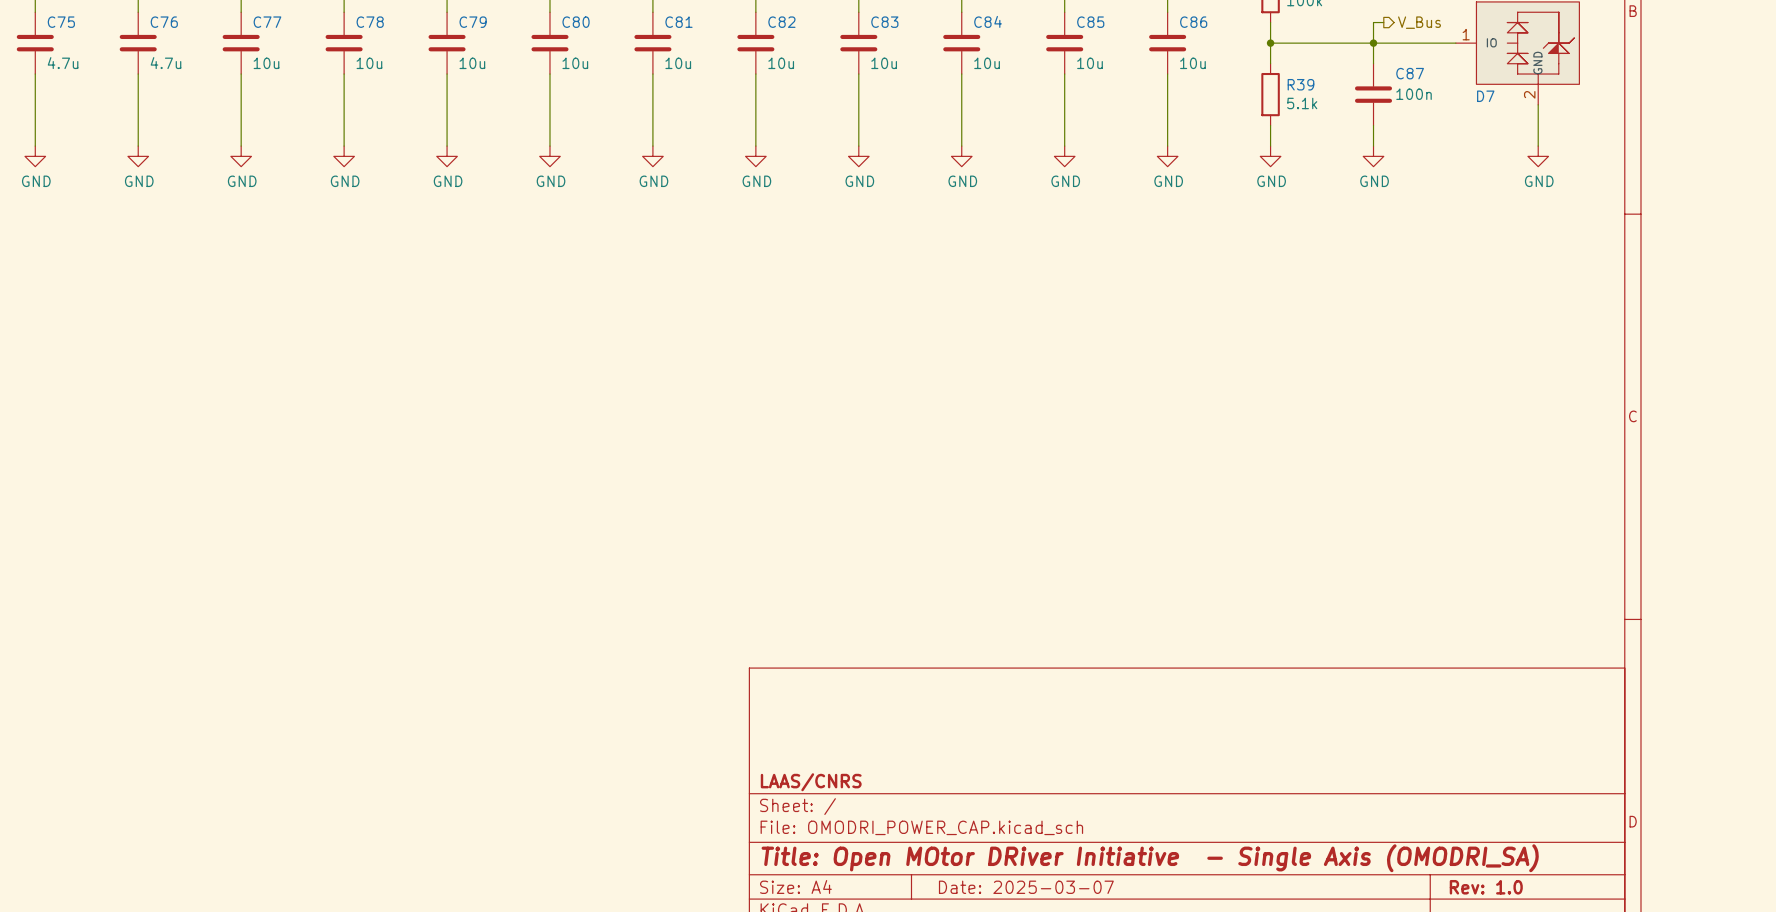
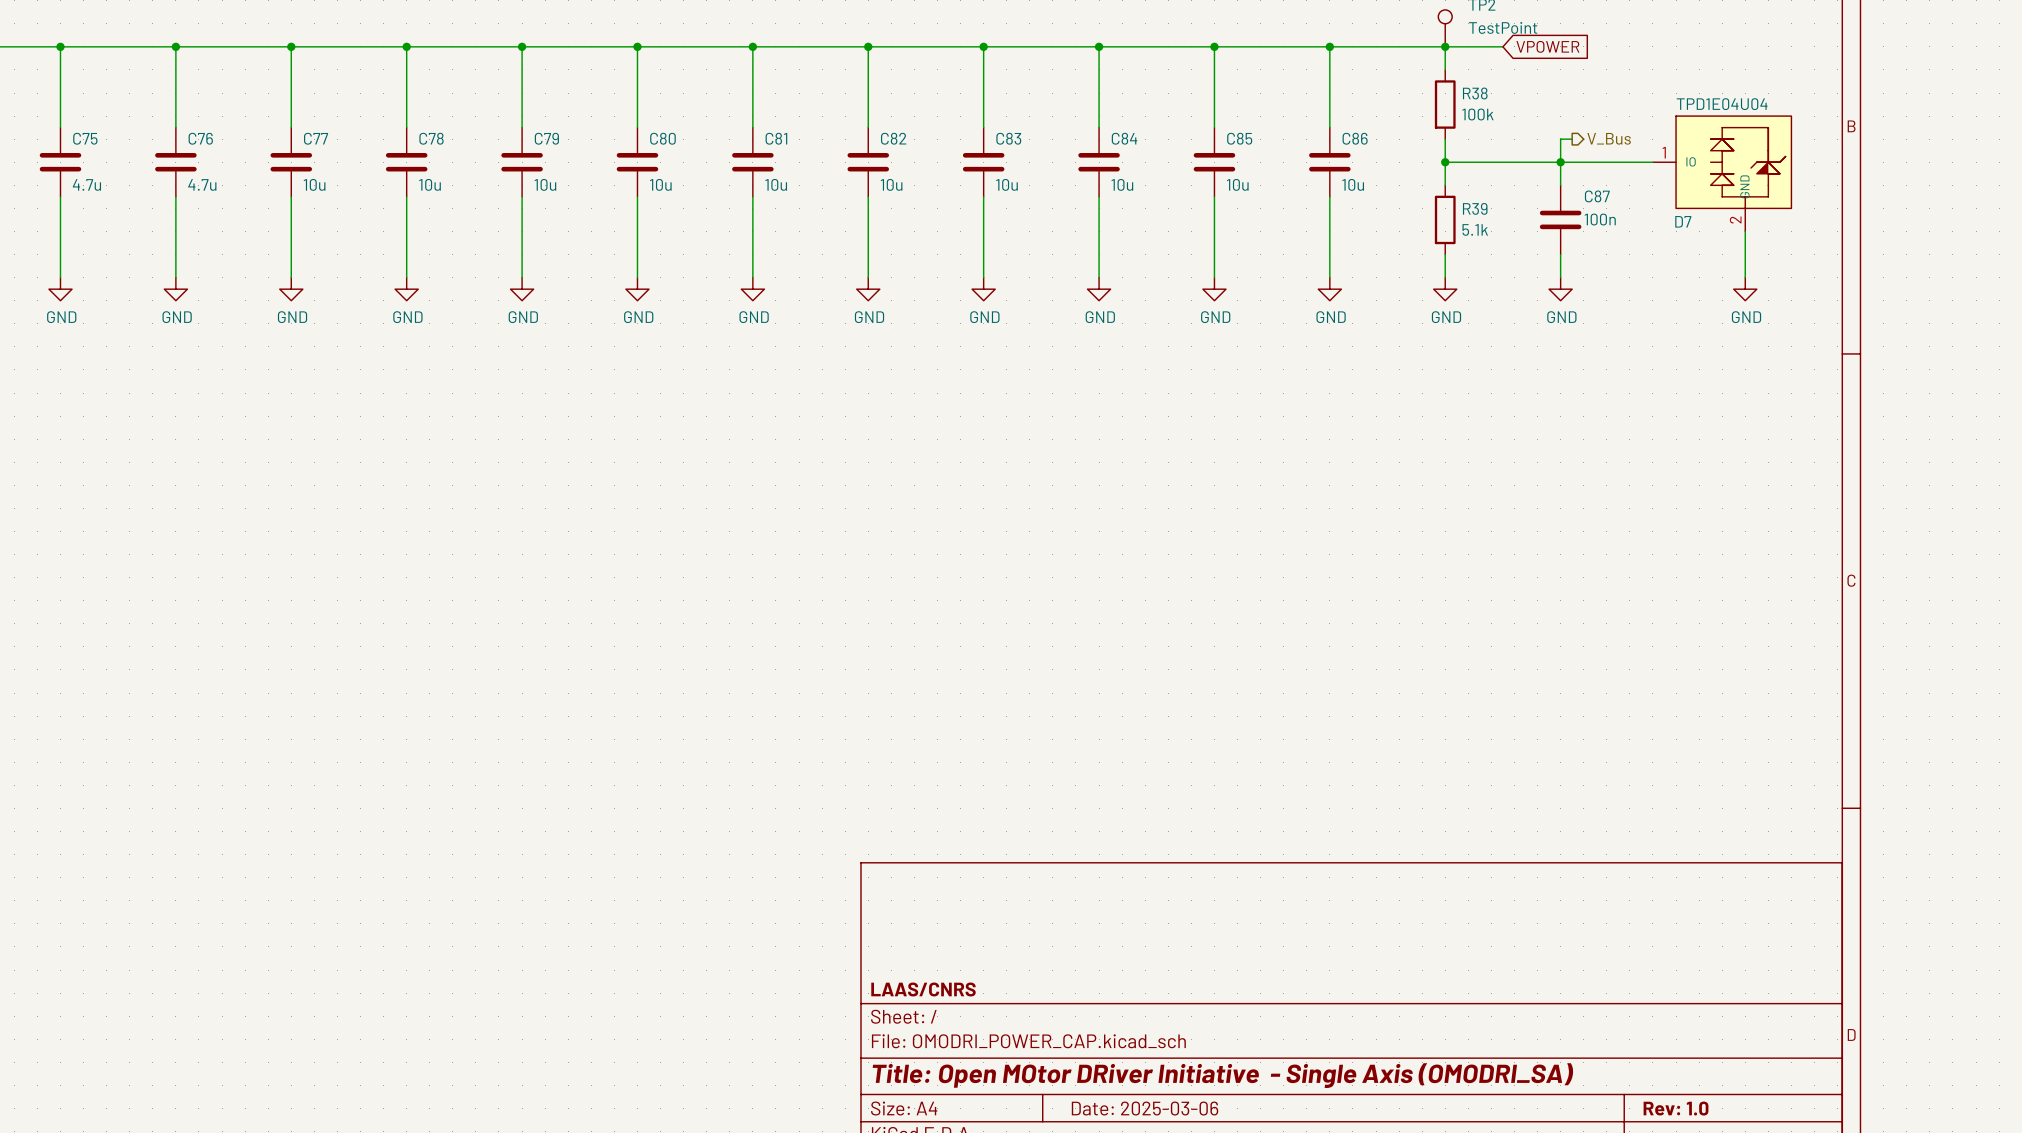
title block: Date: 2025-03-07 (1026, 887) -> Date: 2025-03-06 (1145, 1108)

